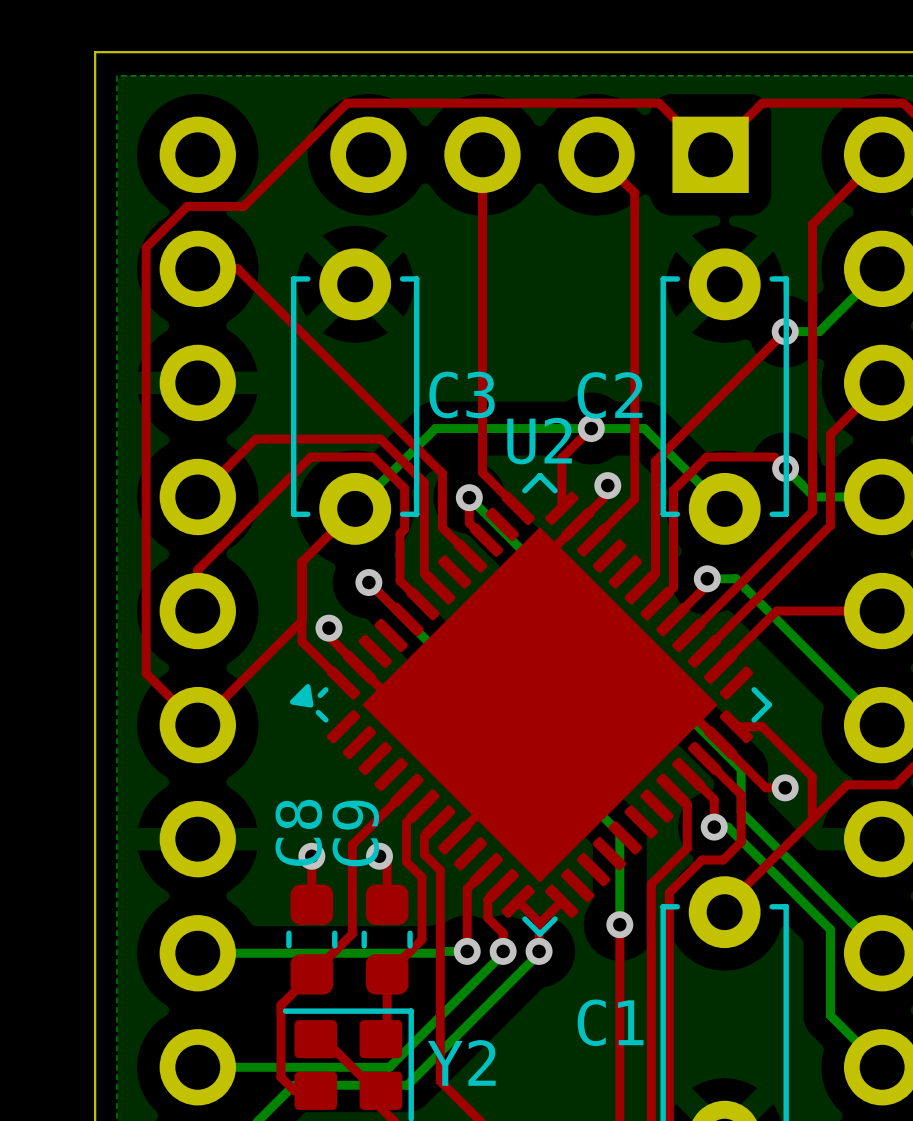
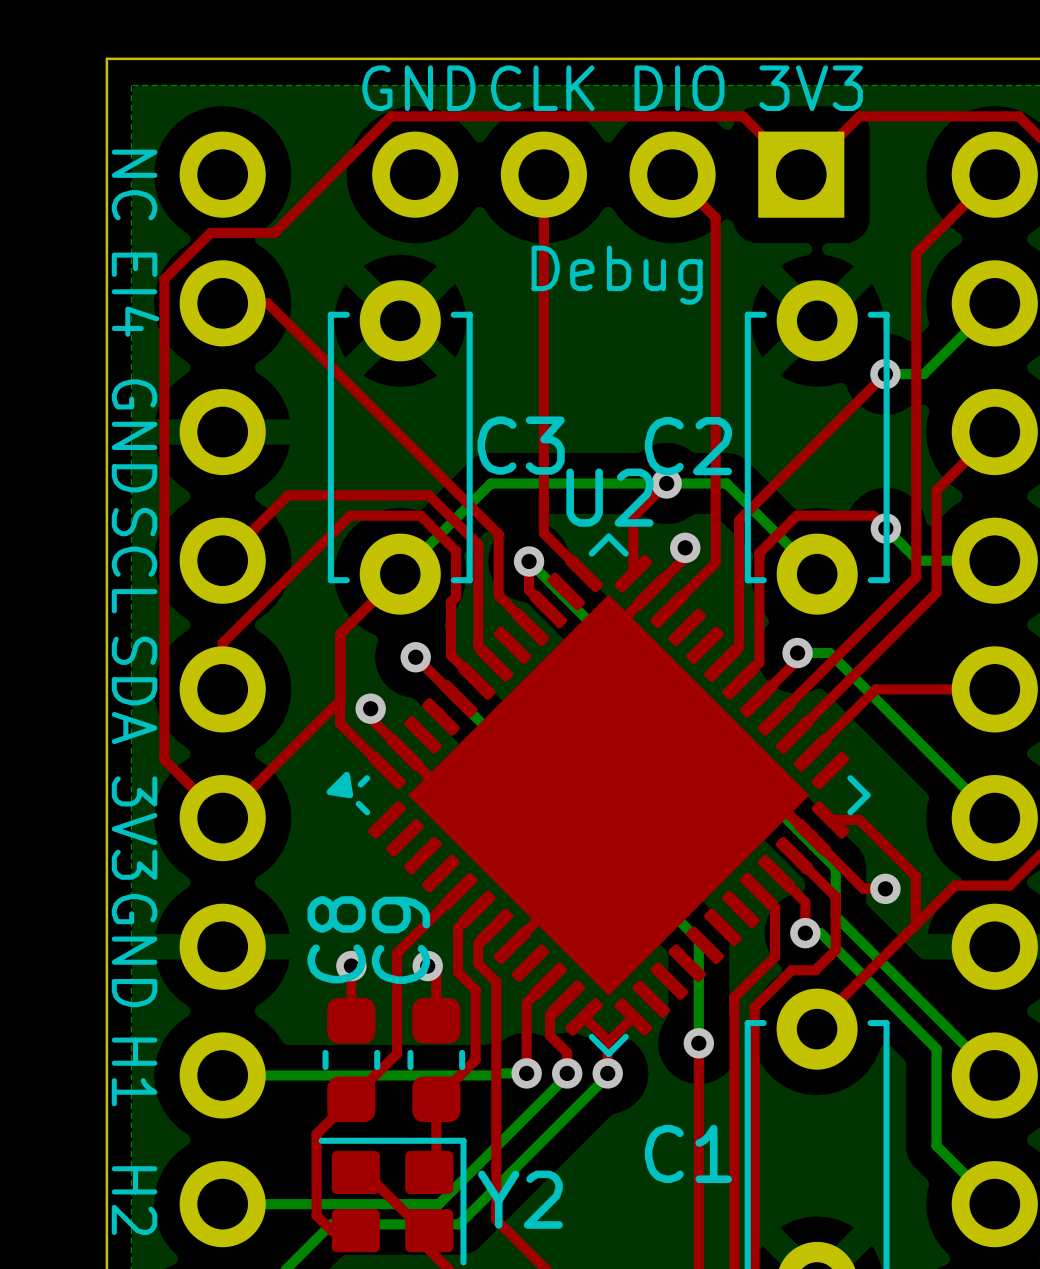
text: none -> GND (418, 88)
text: none -> CLK (542, 88)
text: none -> DIO (679, 88)
text: none -> 3V3 (811, 88)
text: none -> NC (134, 184)
text: none -> Debug (617, 275)
text: none -> EI4 (135, 294)
text: none -> GND (134, 435)
text: none -> SCL (134, 560)
text: none -> SDA (134, 690)
text: none -> 3V3 (134, 828)
text: none -> GND (134, 950)
text: none -> H1 (134, 1071)
text: none -> H2 (134, 1200)

